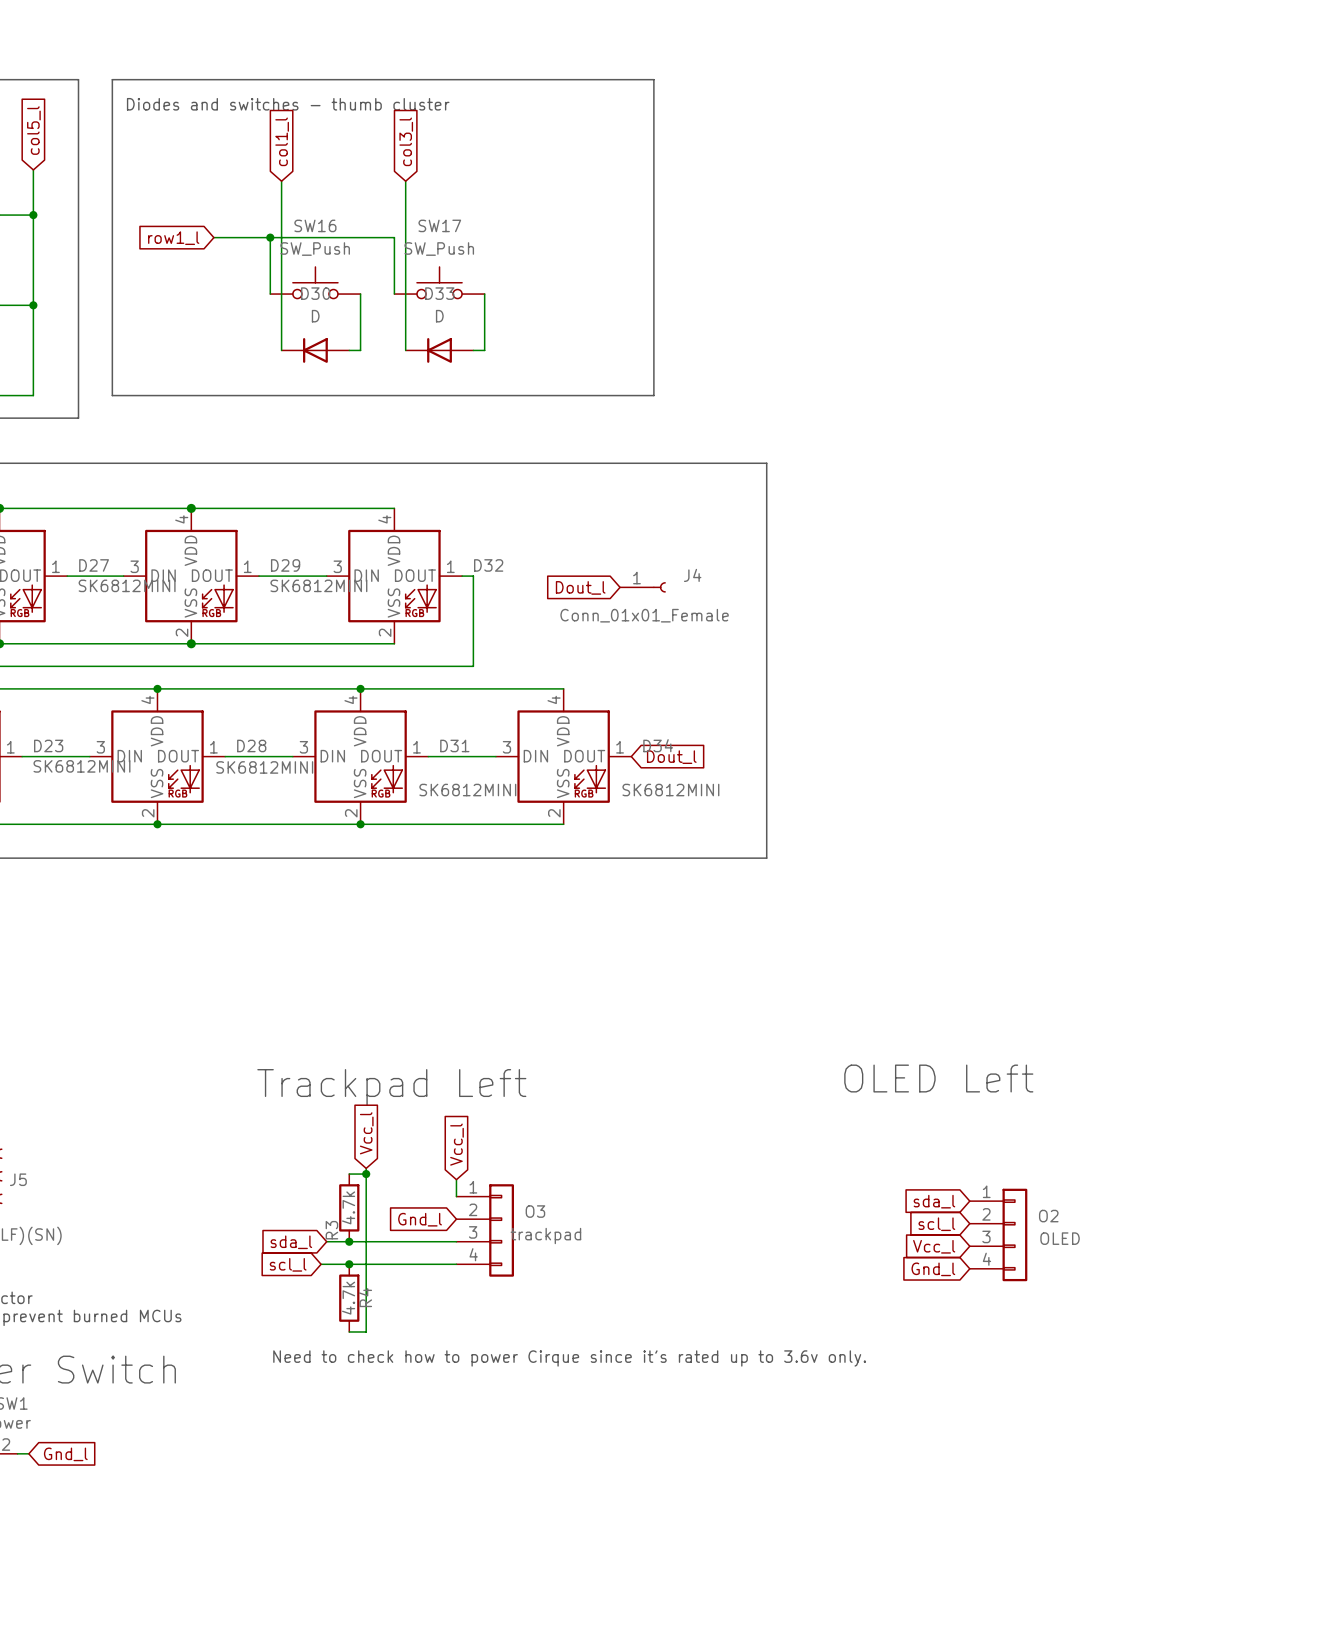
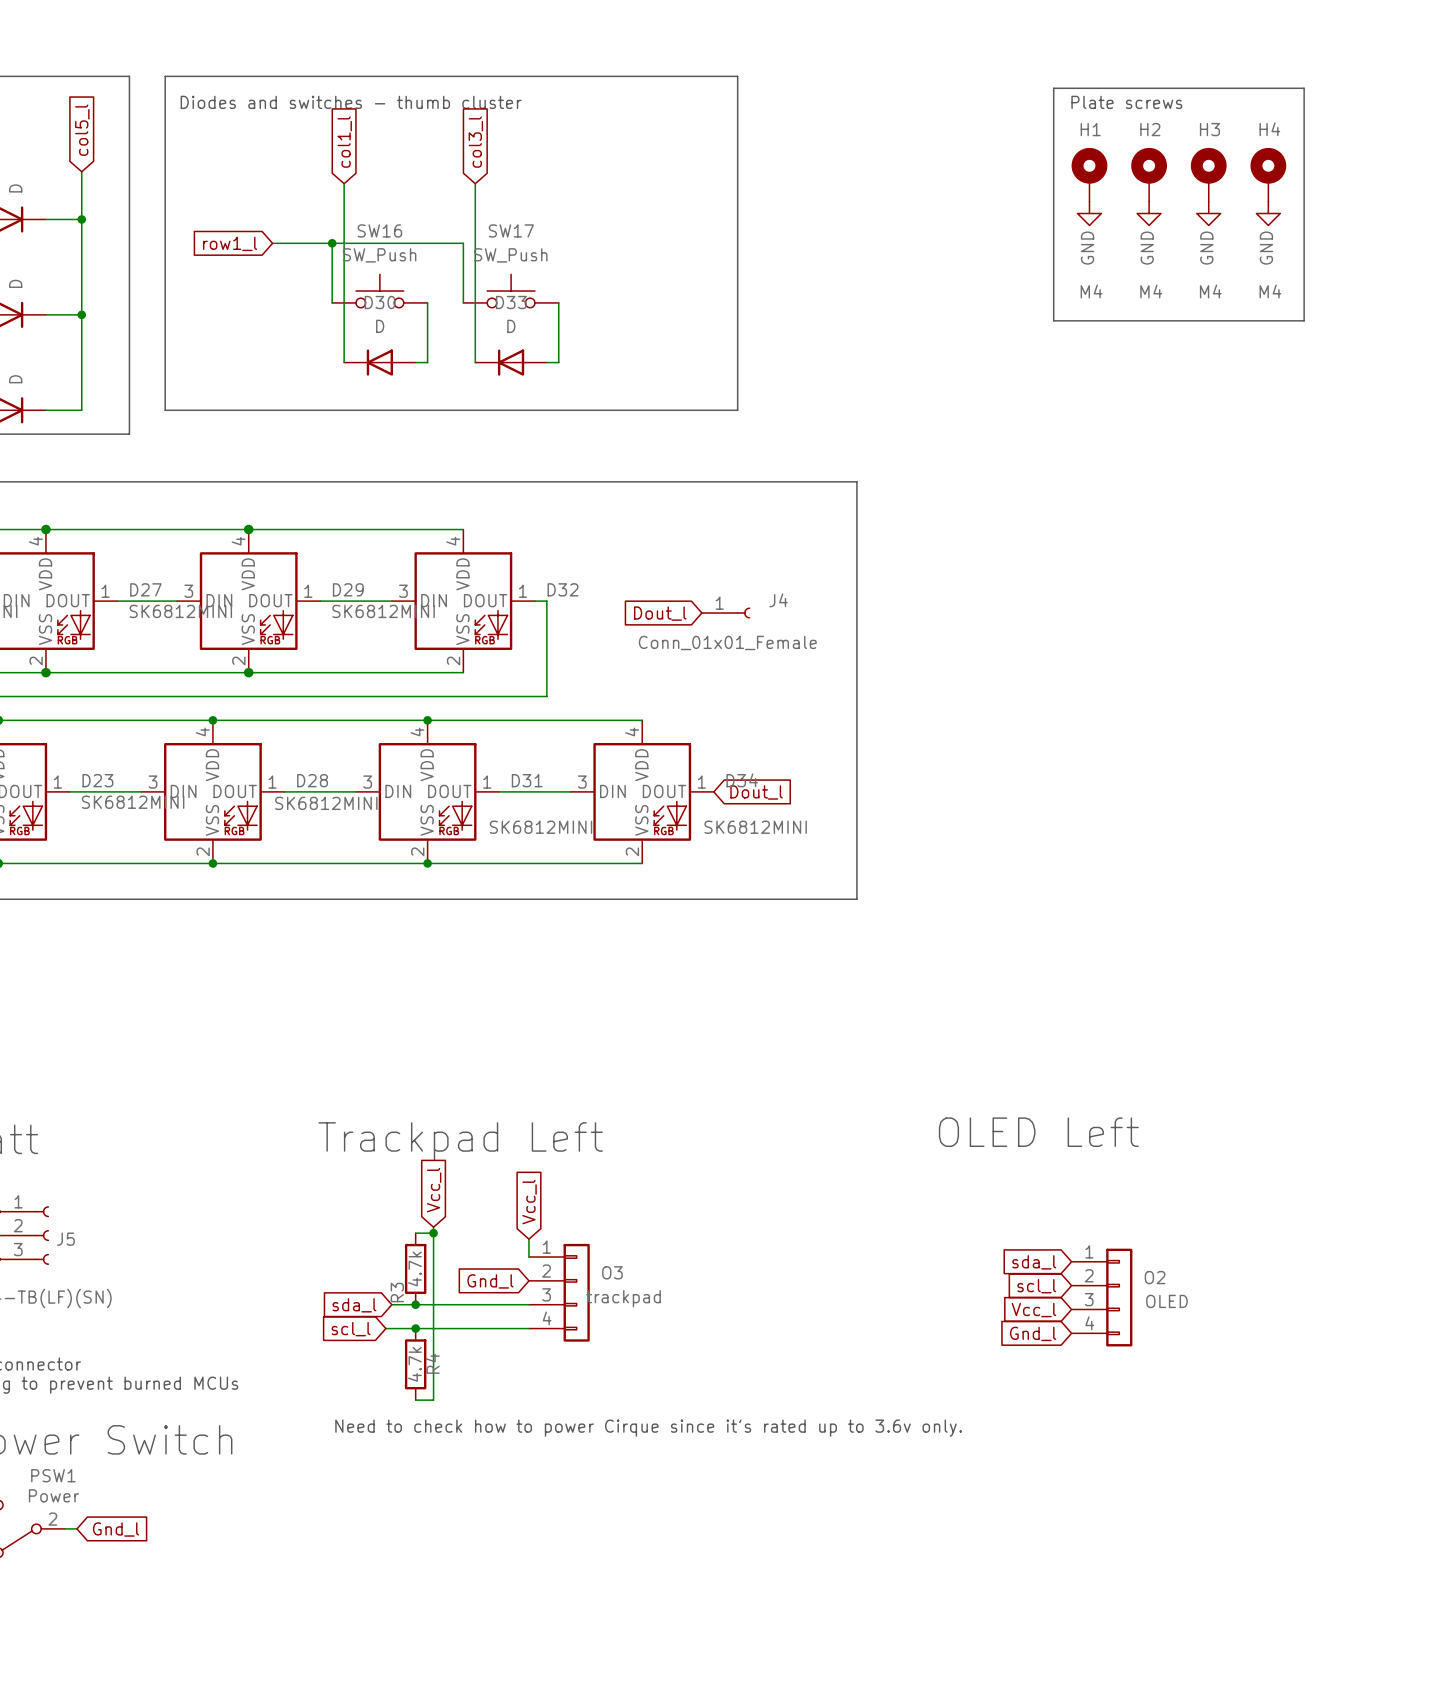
line: none -> (1053, 88) (1304, 88) (1304, 320) (1053, 320) (1053, 88)
text: none -> Plate screws (1126, 102)
H1: none -> M4 (1089, 174)
H2: none -> M4 (1149, 174)
H3: none -> M4 (1208, 174)
H4: none -> M4 (1268, 174)
power symbol: none -> GND (1089, 213)
power symbol: none -> GND (1149, 213)
power symbol: none -> GND (1208, 213)
power symbol: none -> GND (1268, 213)

